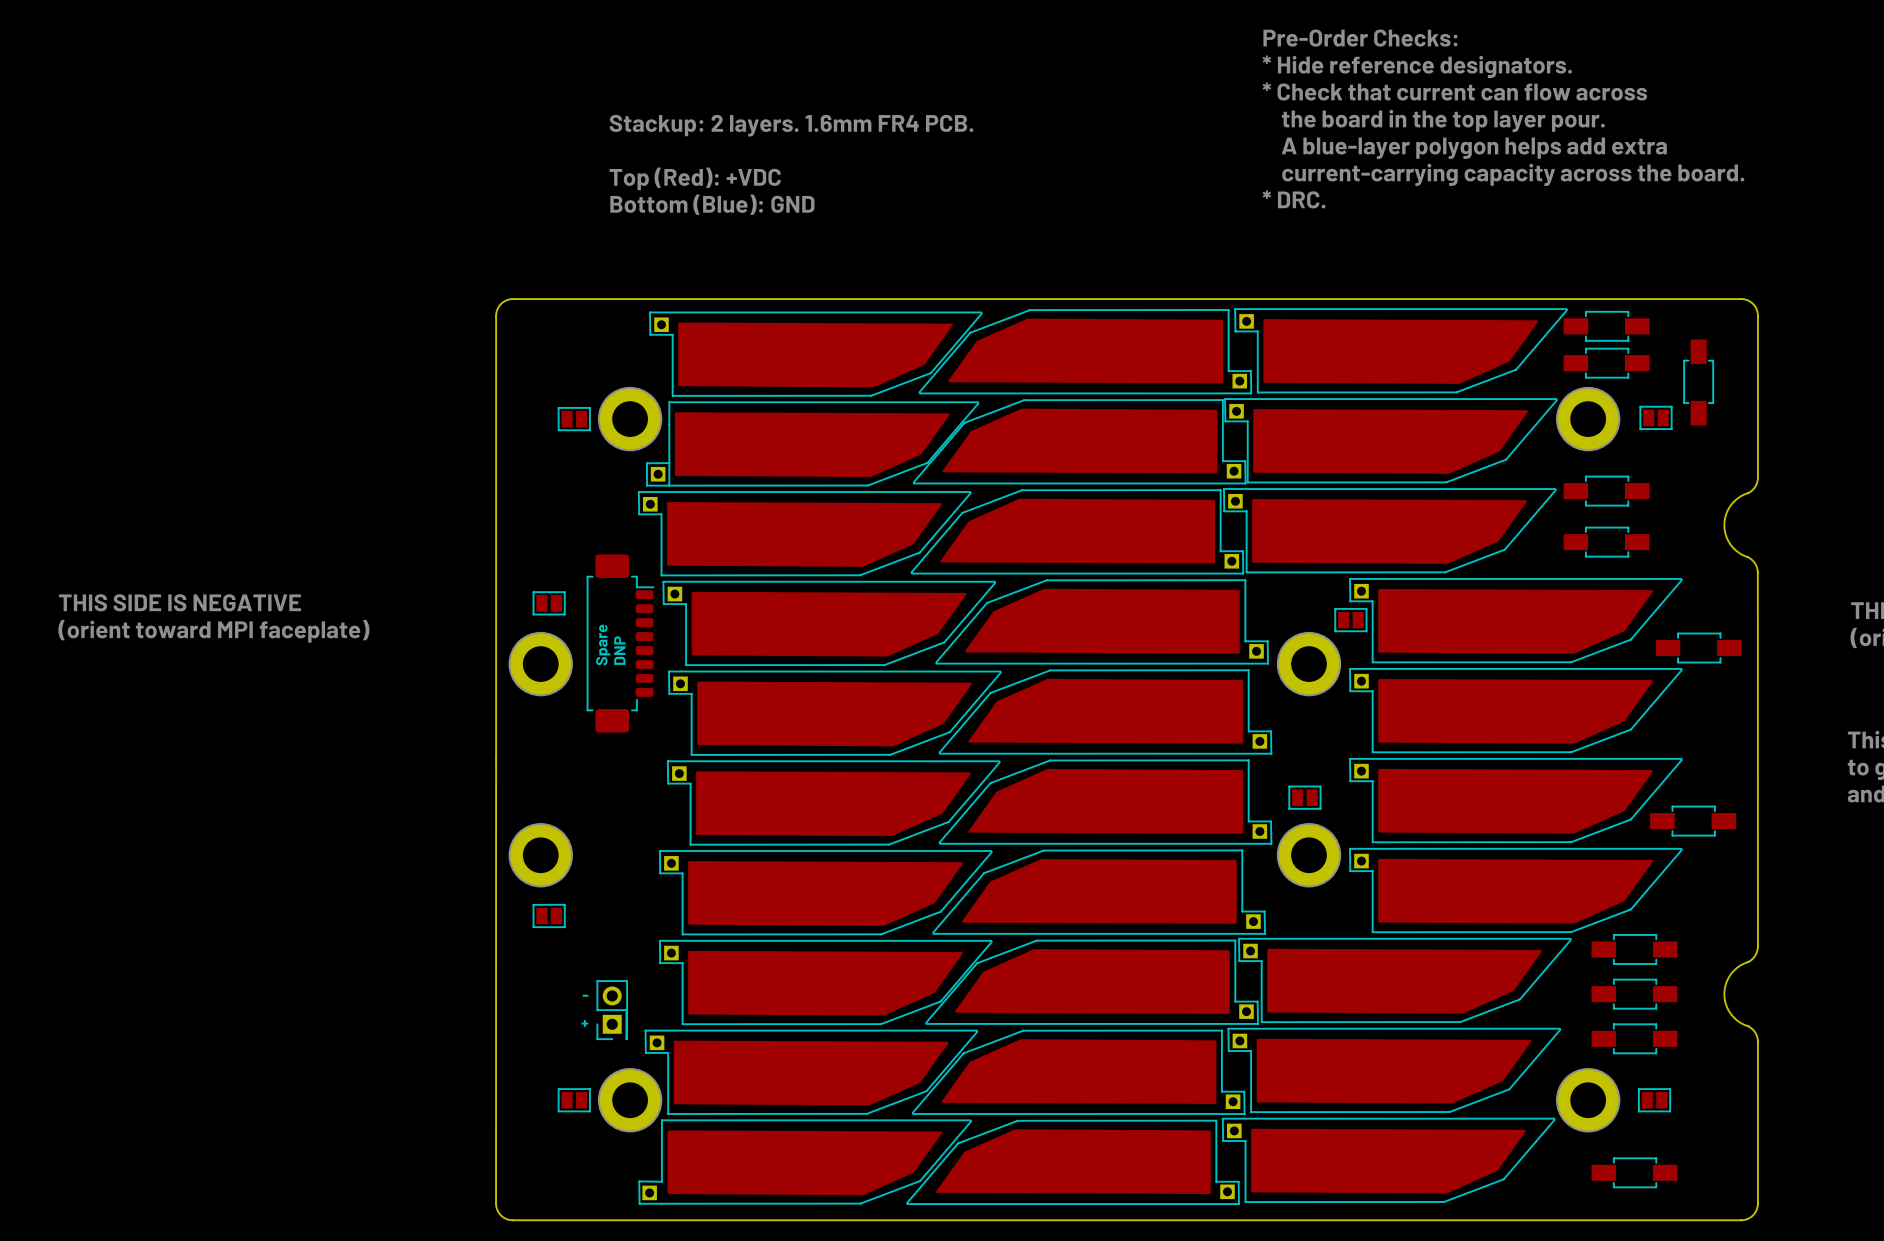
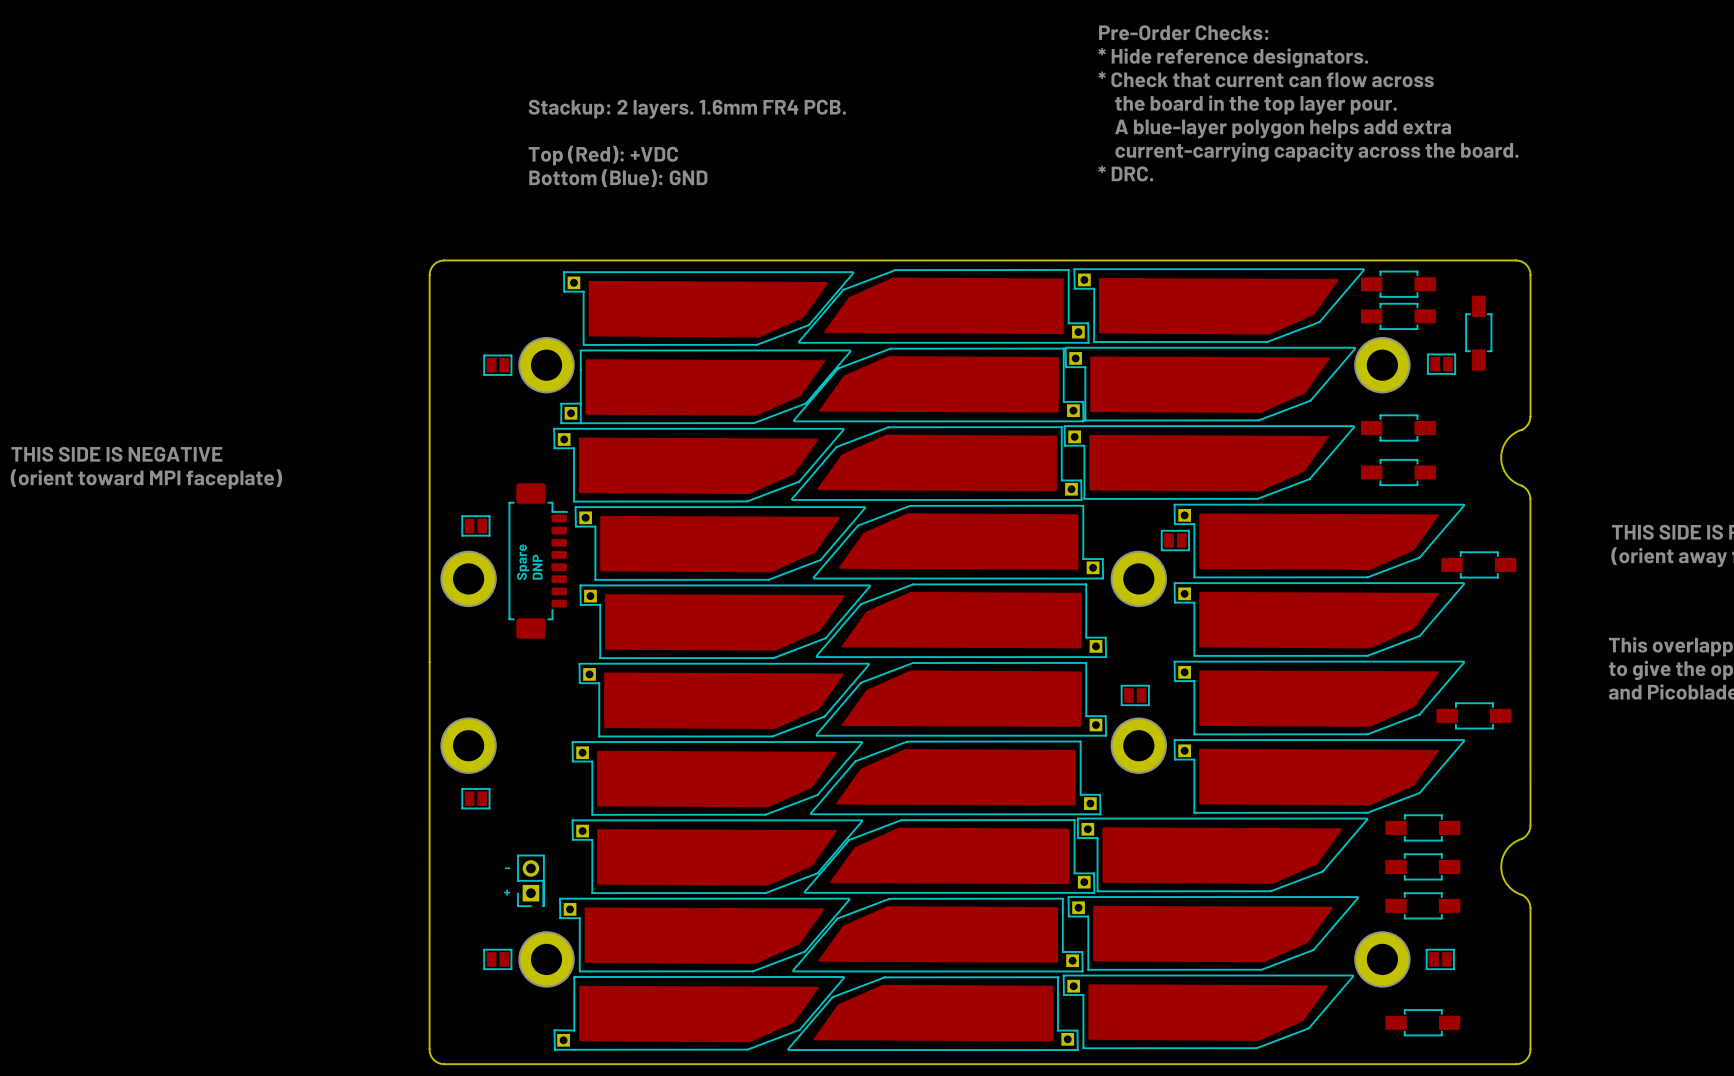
text position: THIS SIDE IS NEGATIVE (180, 602) -> THIS SIDE IS NEGATIVE (116, 454)
text position: (orient toward MPI faceplate) (213, 631) -> (orient toward MPI faceplate) (146, 479)

